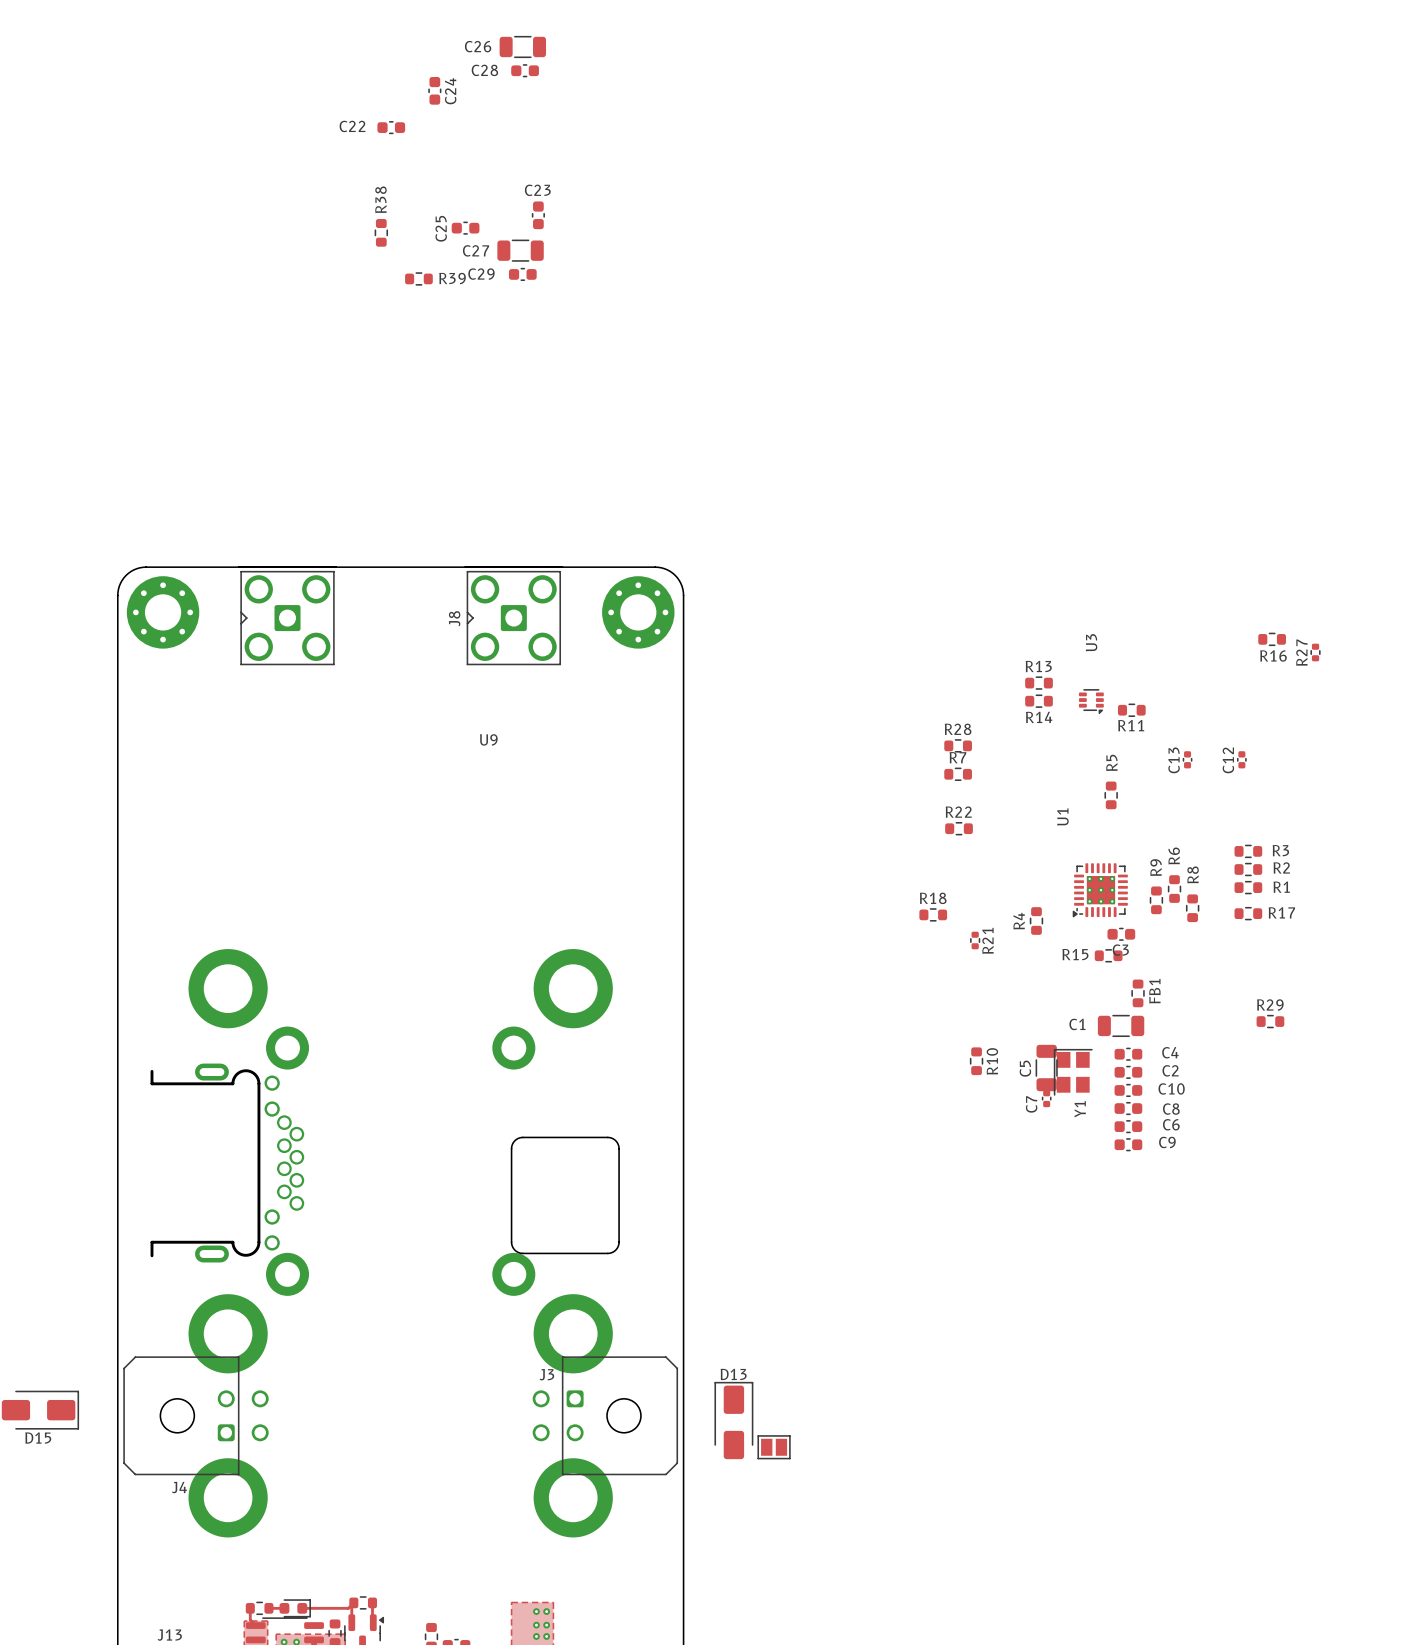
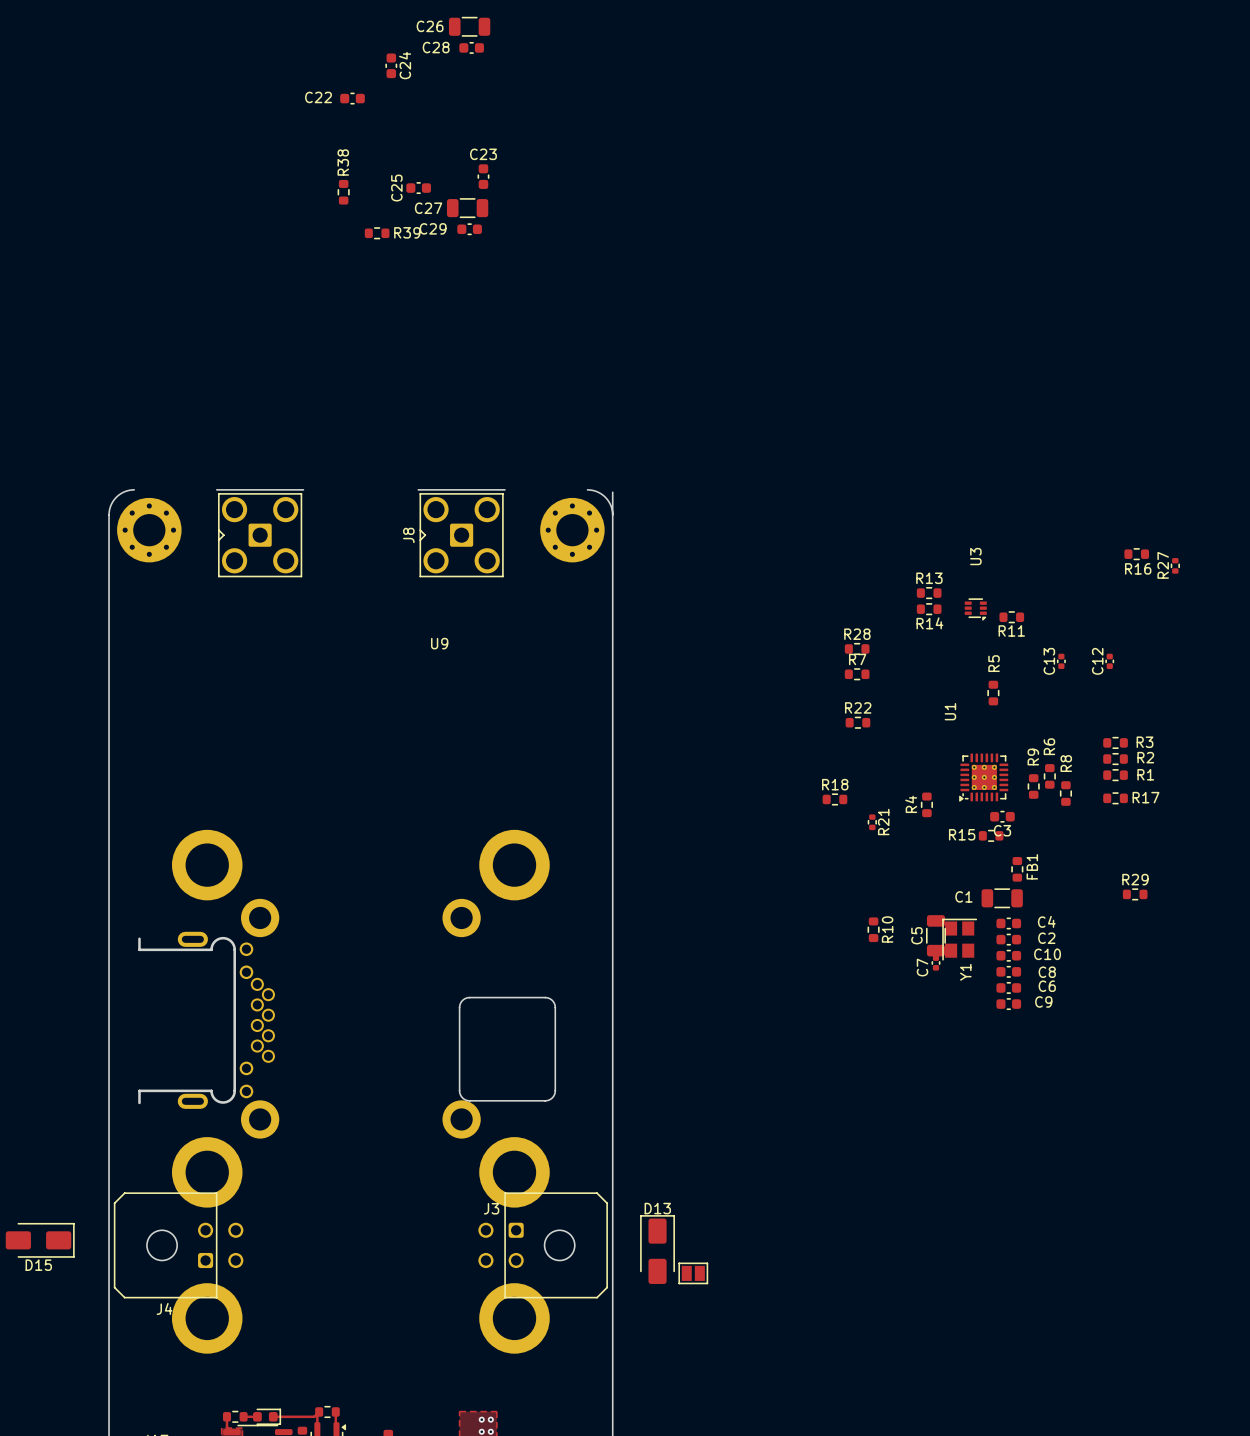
board edge: (146, 567) (655, 567) -> none
board edge: none -> (612, 492) (612, 515)

